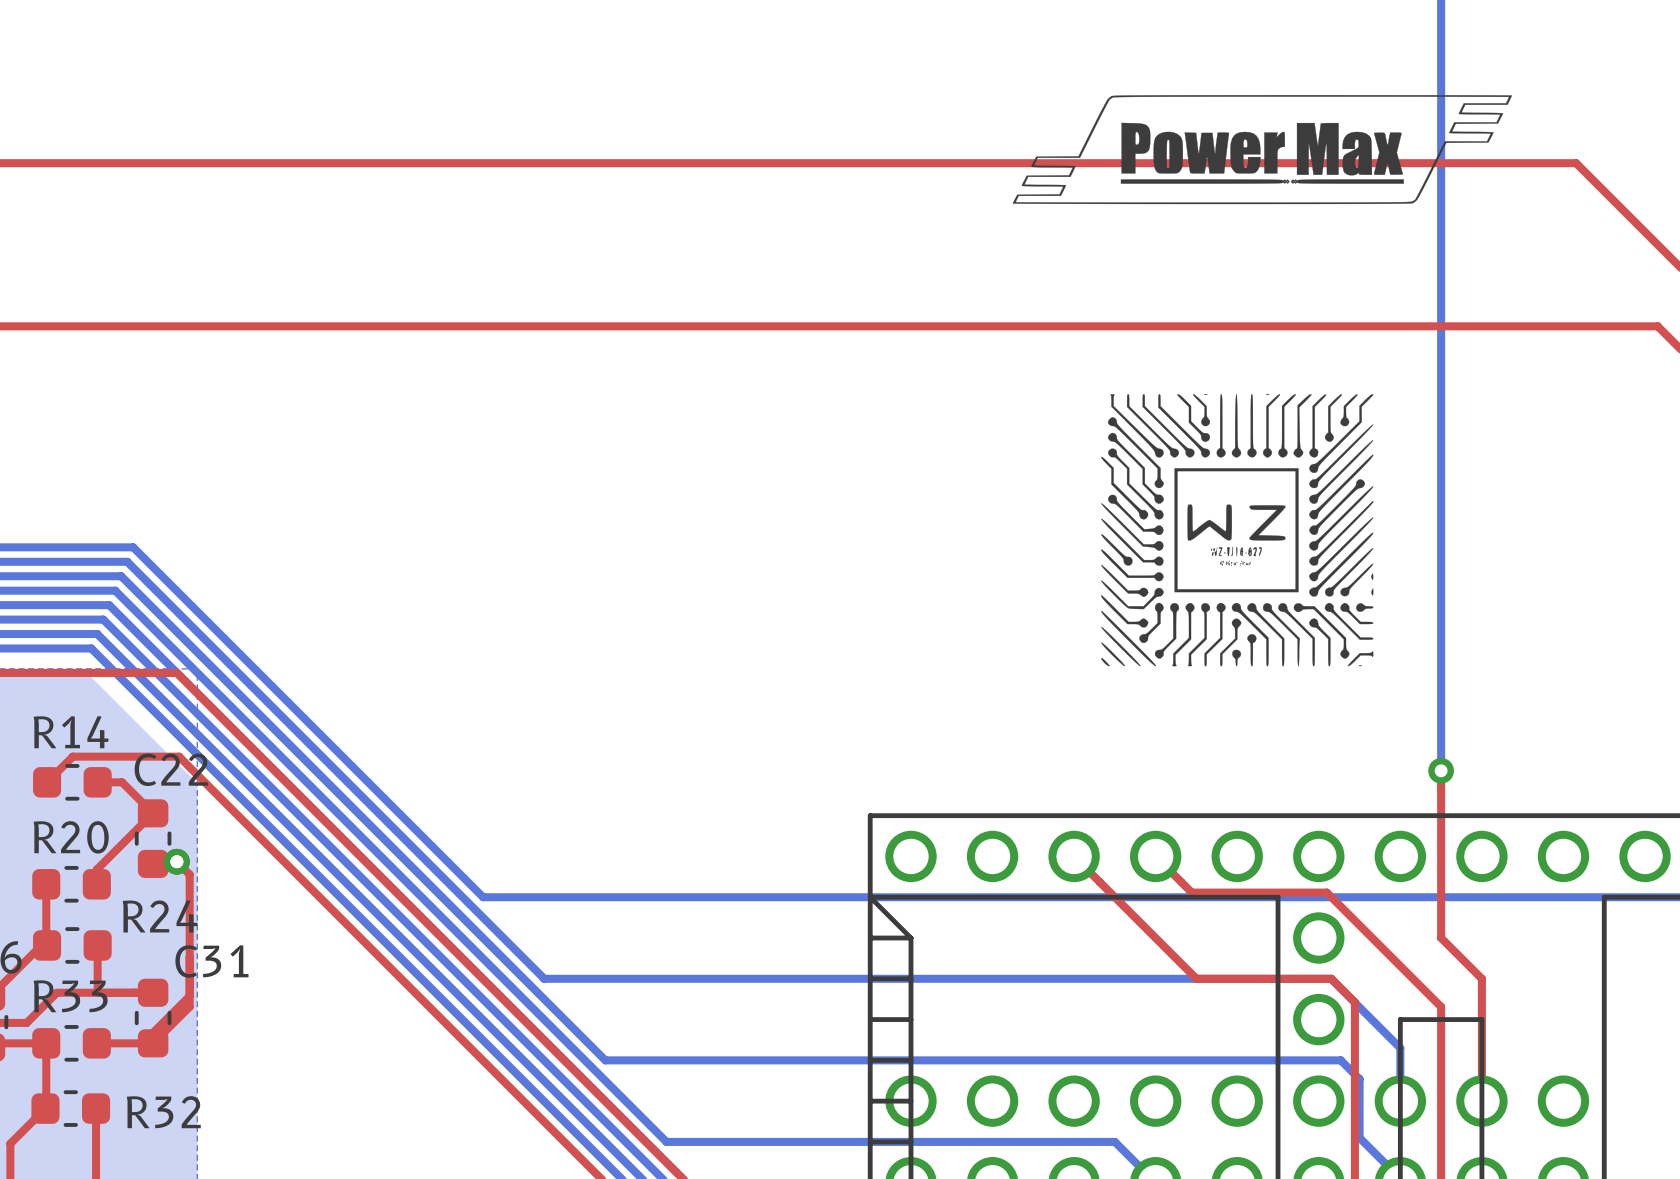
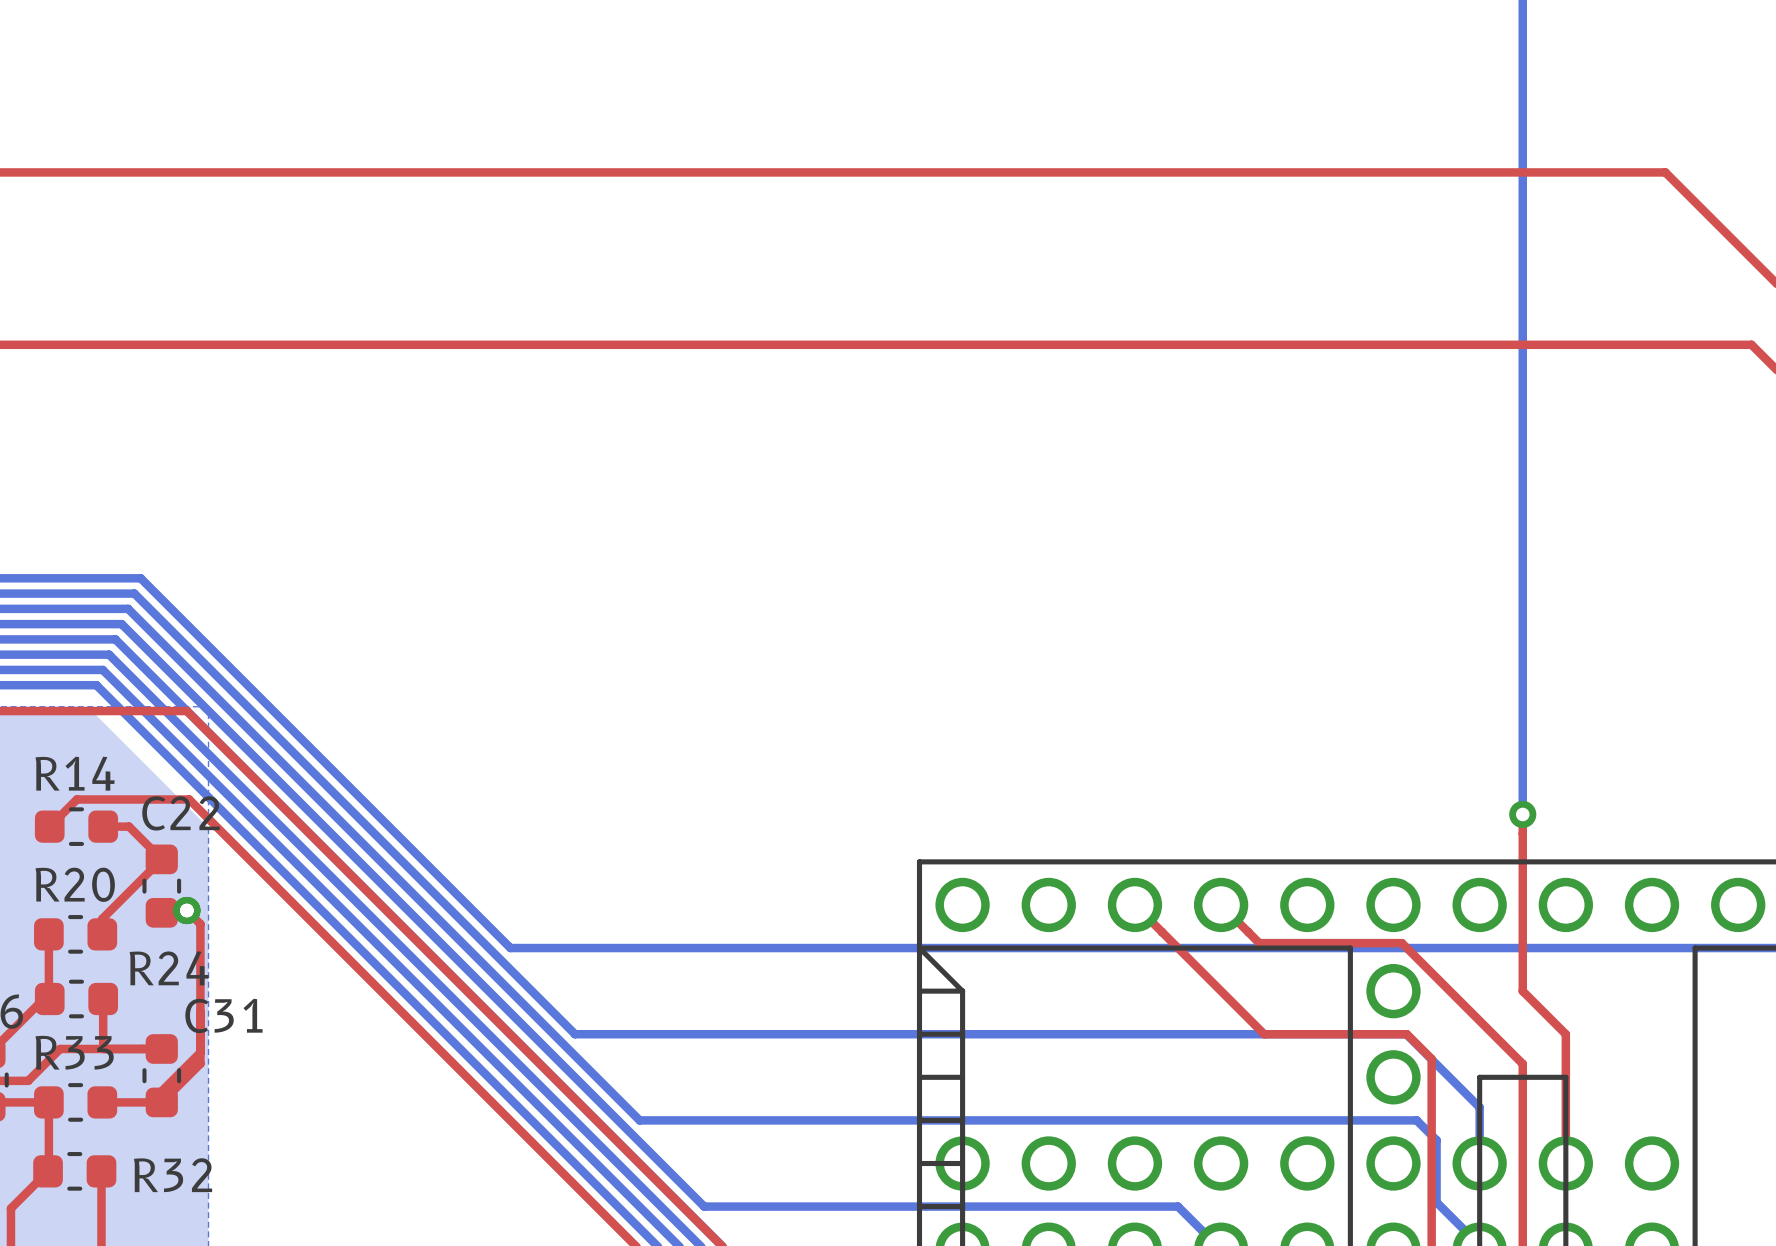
drawing: [1012, 95, 1512, 205] -> none
drawing: [1101, 394, 1374, 667] -> none

